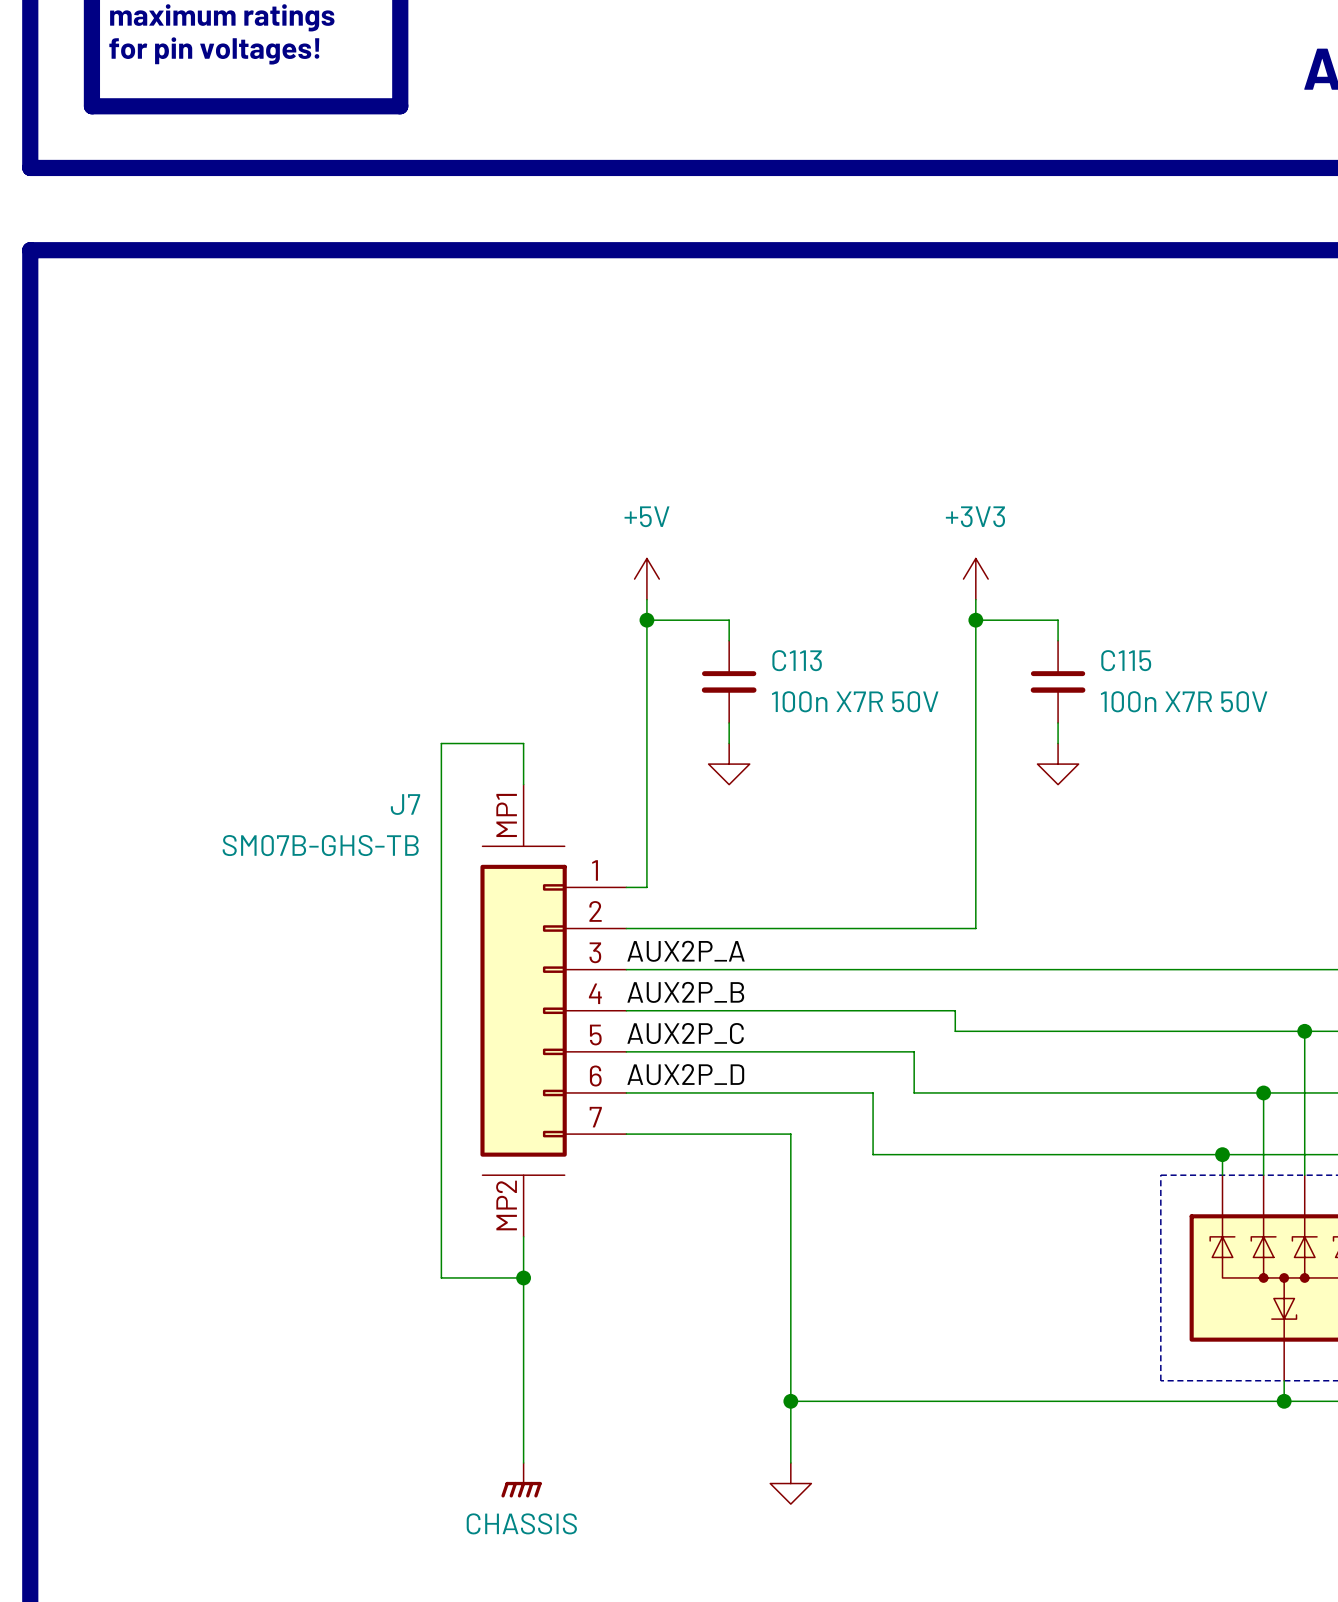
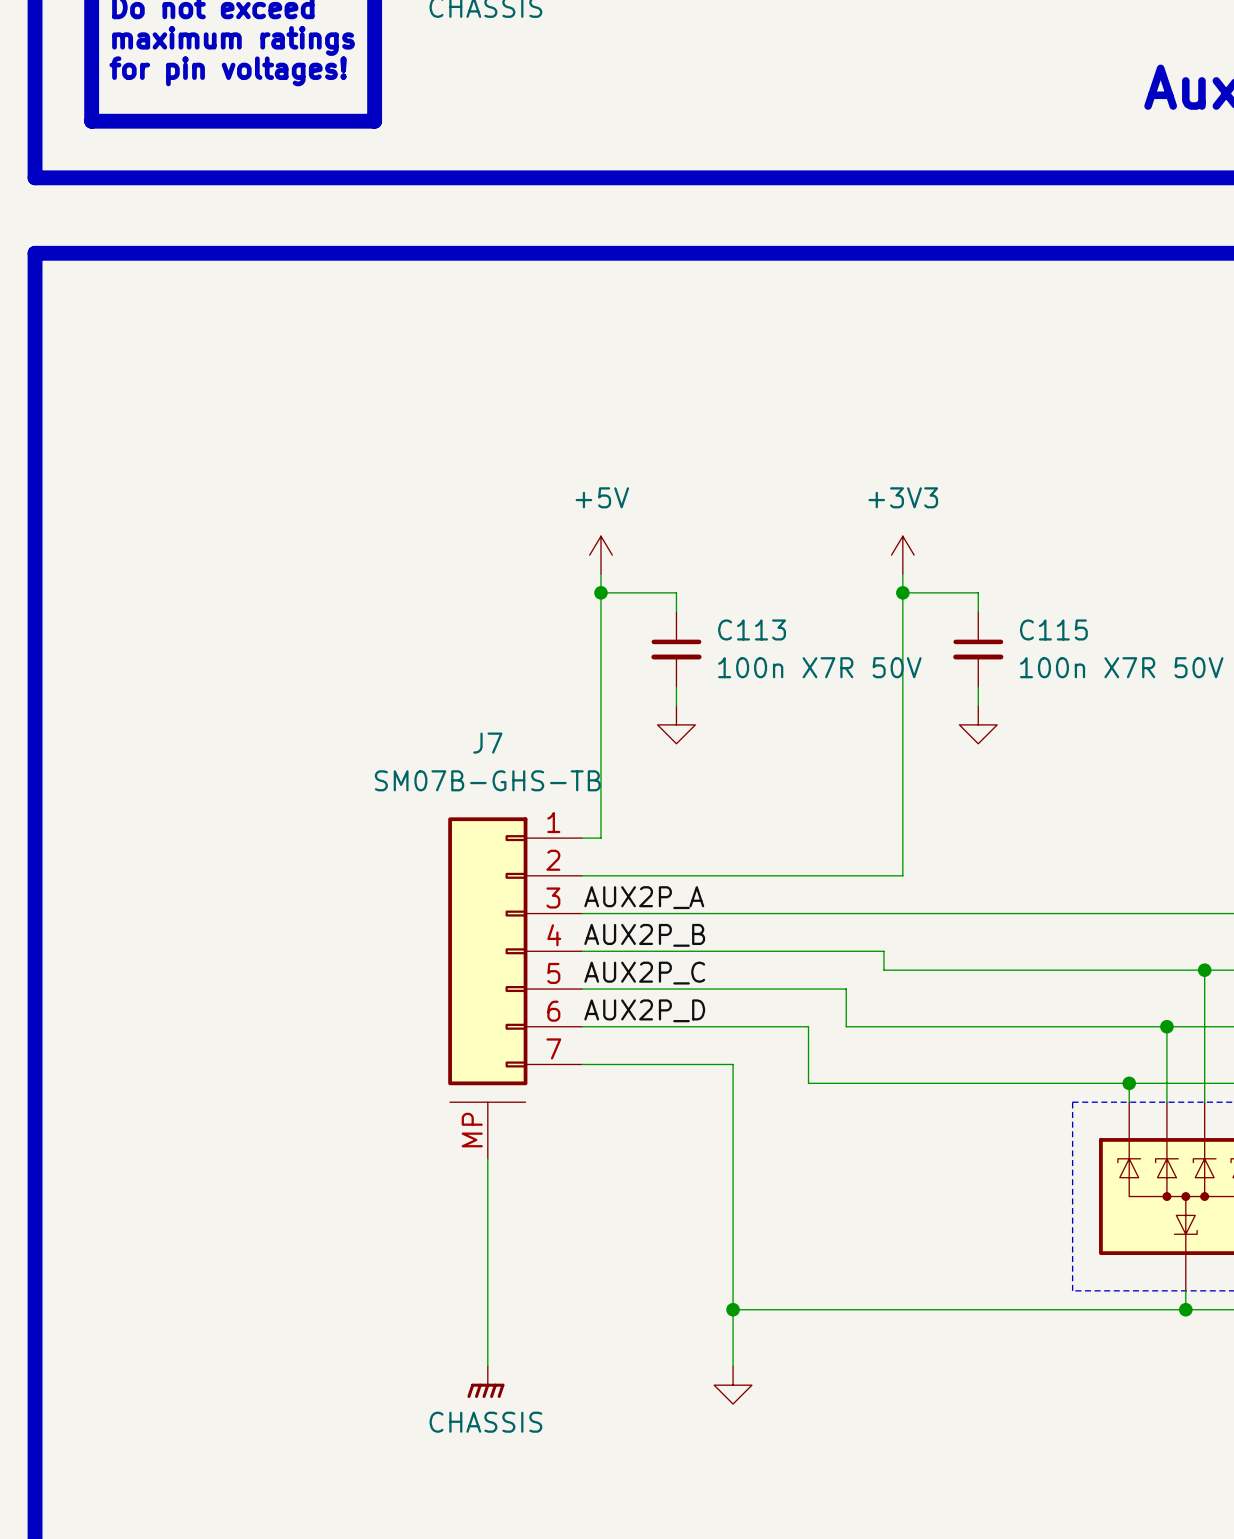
J7 symbol: [480, 784, 627, 1237] -> [448, 817, 583, 1159]
wire: (523, 784) (523, 743) (441, 743) (441, 1277) (523, 1277) -> none
J7 name position: J7 (405, 804) -> J7 (487, 743)
J7 value position: SM07B-GHS-TB (320, 845) -> SM07B-GHS-TB (487, 780)
junction: (523, 1277) -> none

